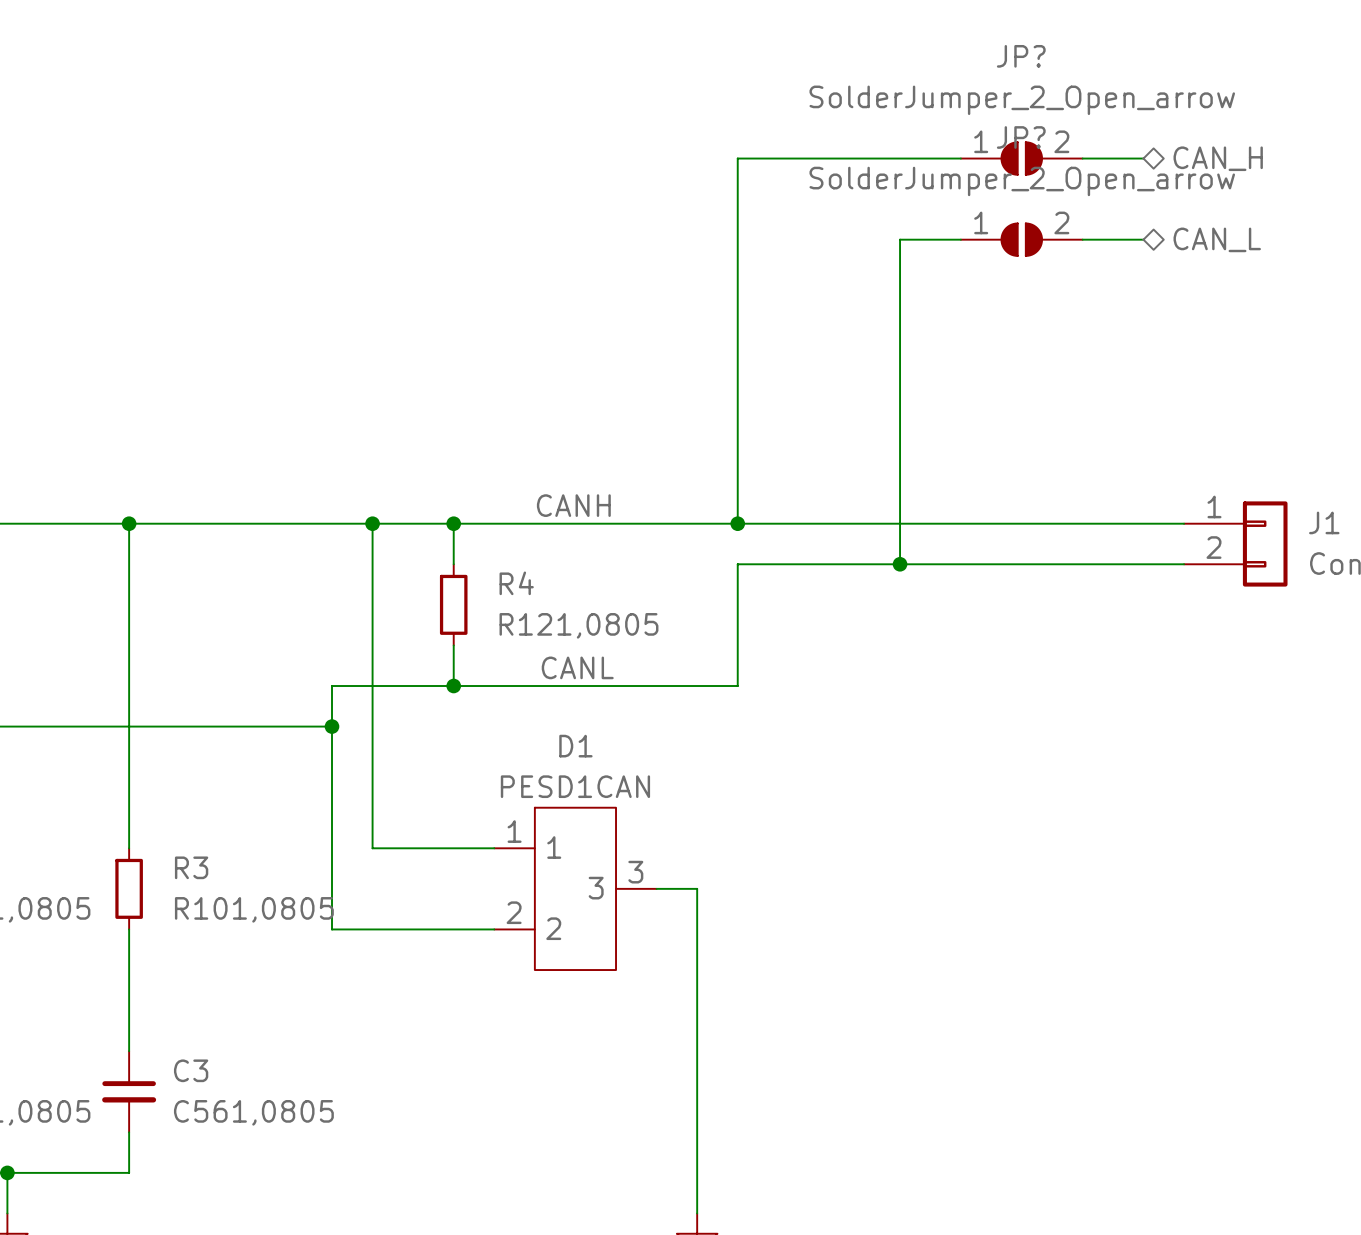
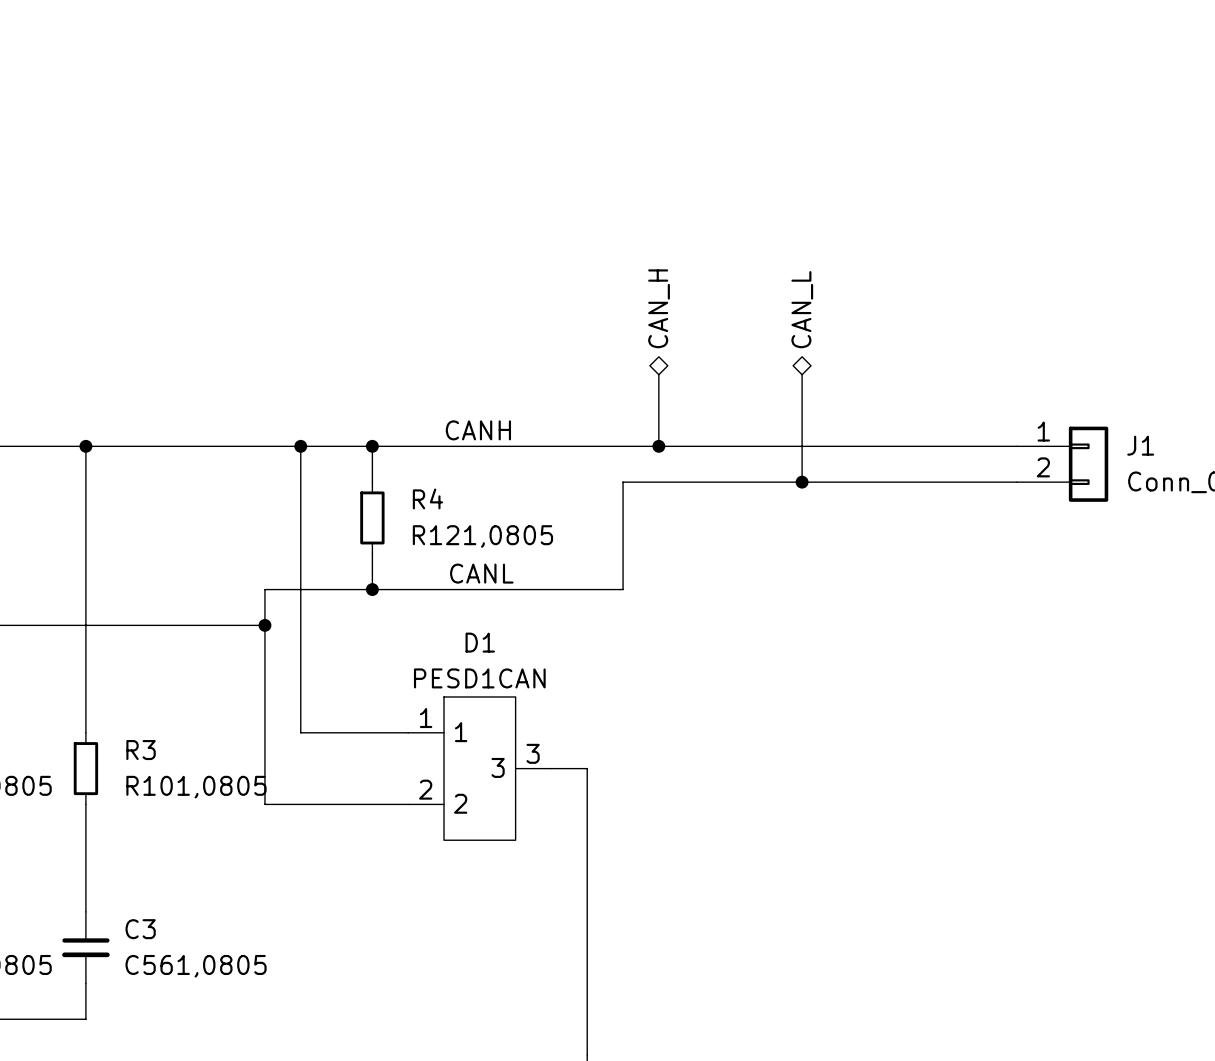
wire: (960, 158) (737, 158) (737, 523) -> none
JP?: SolderJumper_2_Open_arrow (1021, 158) -> none
wire: (1082, 158) (1143, 158) -> none
hierarchical label: CAN_H (1218, 158) -> none
wire: (960, 239) (900, 239) (900, 564) -> none
JP?: SolderJumper_2_Open_arrow (1021, 239) -> none
wire: (1082, 239) (1143, 239) -> none
hierarchical label rotation: 0° (1217, 239) -> 90° counterclockwise (802, 309)
hierarchical label position: CAN_L (1217, 239) -> CAN_L (802, 309)
hierarchical label: none -> CAN_H (659, 308)
wire: none -> (658, 374) (658, 446)
wire: none -> (802, 374) (802, 482)
junction position: (737, 523) -> (658, 446)
junction position: (900, 564) -> (802, 482)

